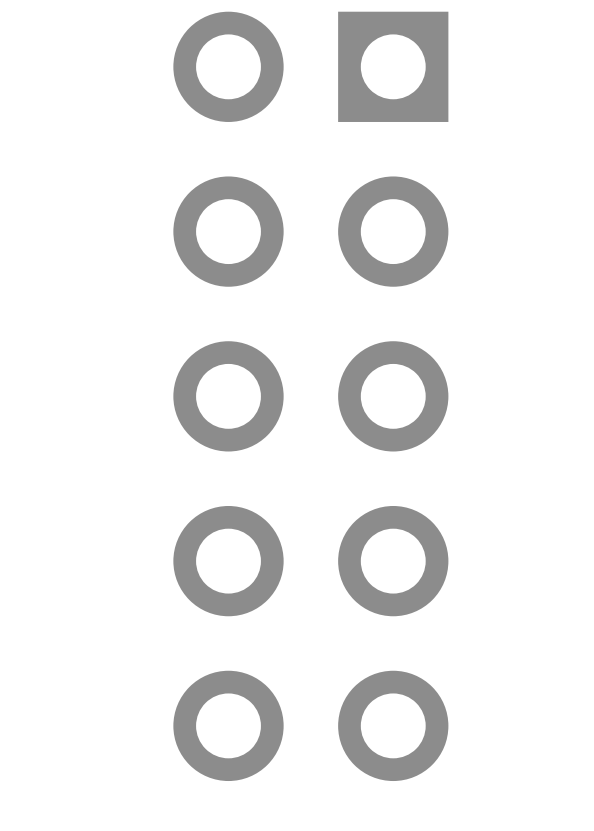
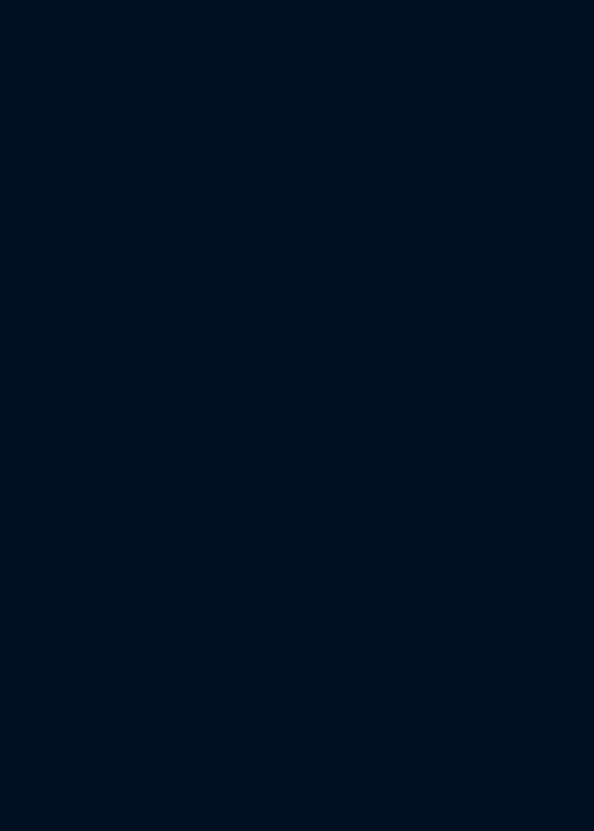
part: (310, 396) -> none

